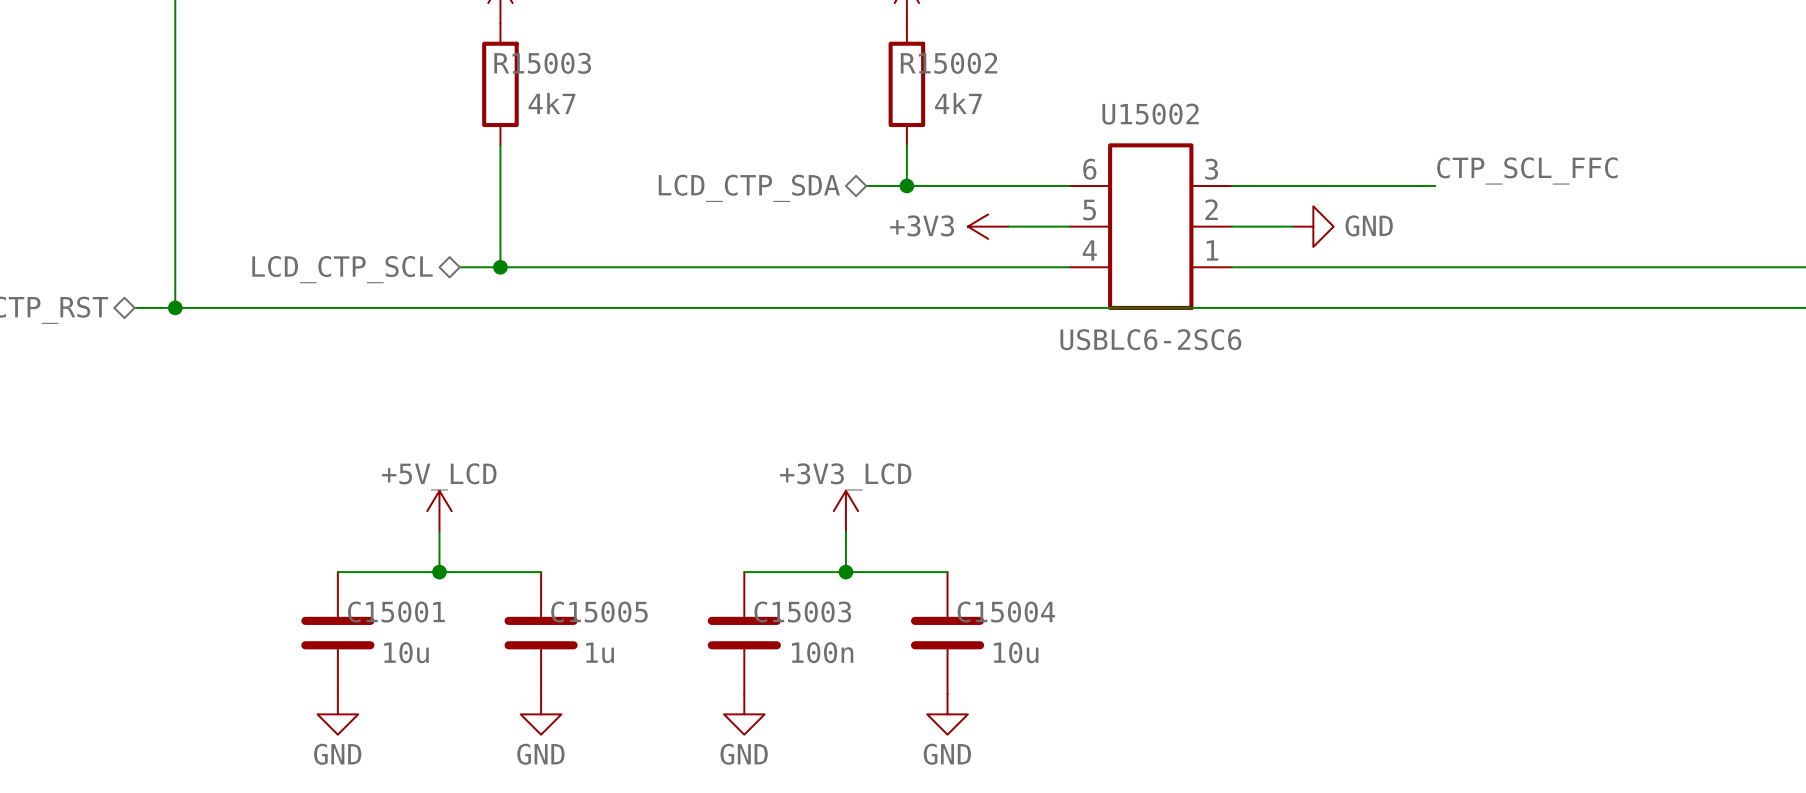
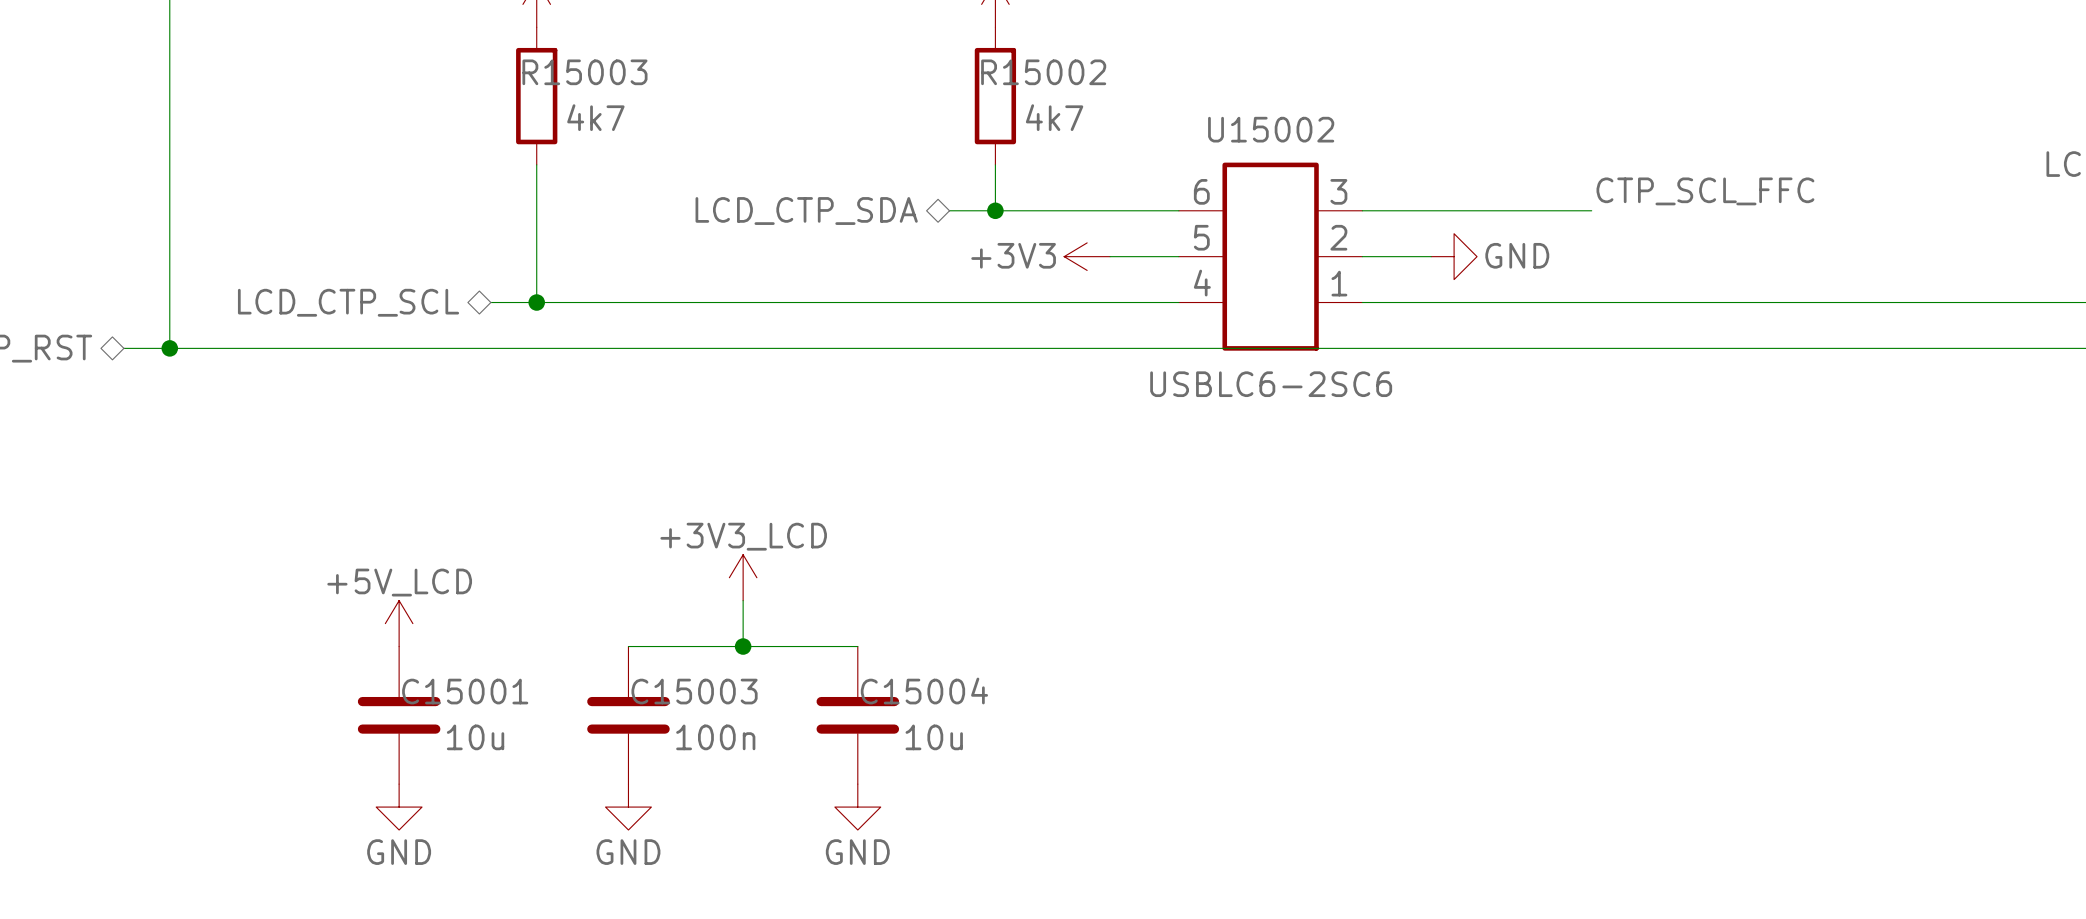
power symbol position: +5V_LCD (439, 511) -> +5V_LCD (399, 623)
power symbol position: +3V3_LCD (845, 511) -> +3V3_LCD (743, 577)
wire: (439, 531) (439, 572) -> none
wire: (845, 531) (845, 572) -> (743, 600) (743, 646)
wire: (337, 572) (541, 572) -> none
junction: (439, 572) -> none
junction: none -> (743, 646)
wire: (784, 572) (947, 572) -> (628, 646) (811, 646)
junction: (845, 572) -> none
C15001 position: (337, 633) -> (399, 715)
C15005: 1u (541, 633) -> none
C15003 position: (744, 633) -> (628, 715)
C15004 position: (947, 633) -> (857, 715)
power symbol position: GND (337, 714) -> GND (399, 807)
power symbol position: GND (541, 714) -> GND (628, 807)
power symbol position: GND (744, 714) -> GND (857, 807)
power symbol: GND (947, 714) -> none

